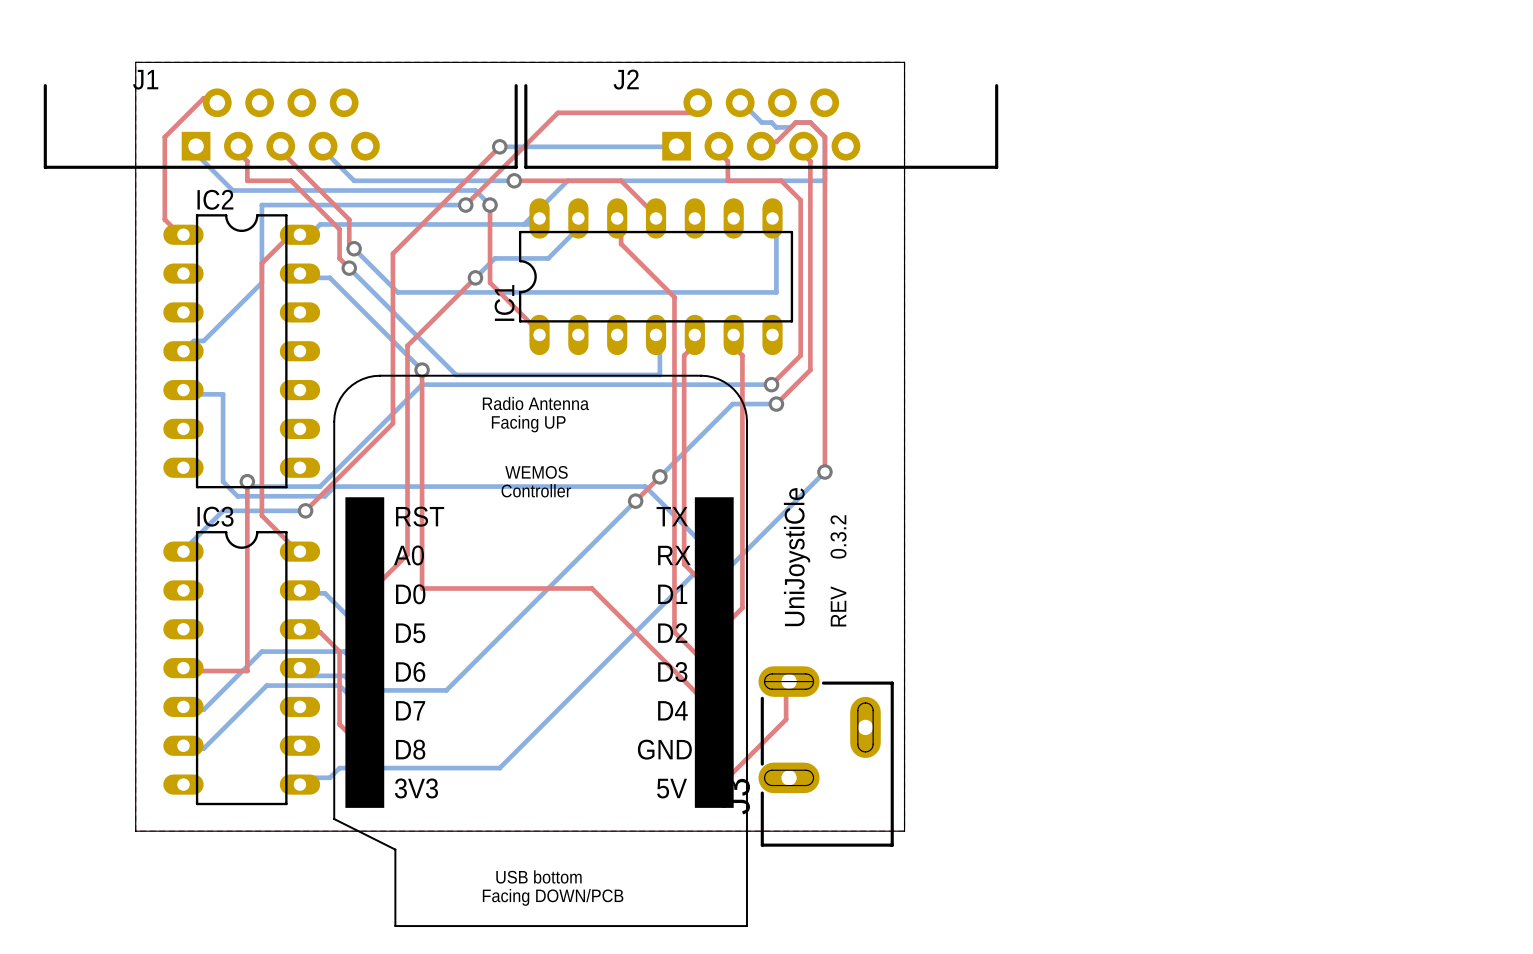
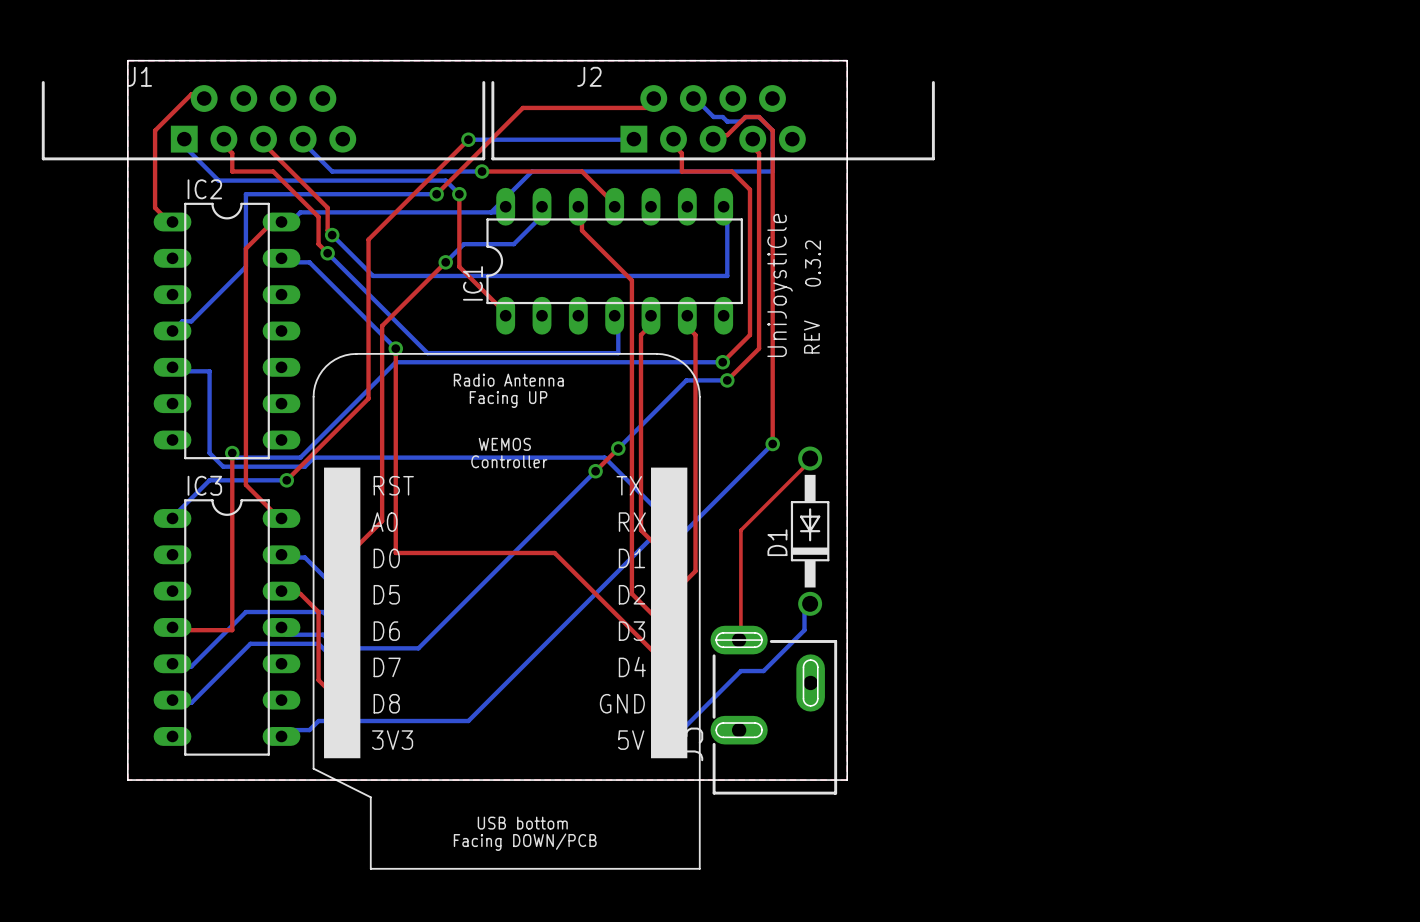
text position: 0.3.2 (838, 536) -> 0.3.2 (813, 263)
text position: UniJoystiCle (797, 557) -> UniJoystiCle (780, 285)
D1: none -> (810, 531)
text position: REV (838, 606) -> REV (811, 337)
bottom track: none -> (810, 603) (809, 607) (804, 607) (804, 630) (763, 671) (740, 671) (672, 739) (669, 740)
top track: (789, 681) (786, 685) (786, 719) (718, 787) (714, 788) -> (739, 640) (740, 639) (740, 530) (809, 462) (810, 458)

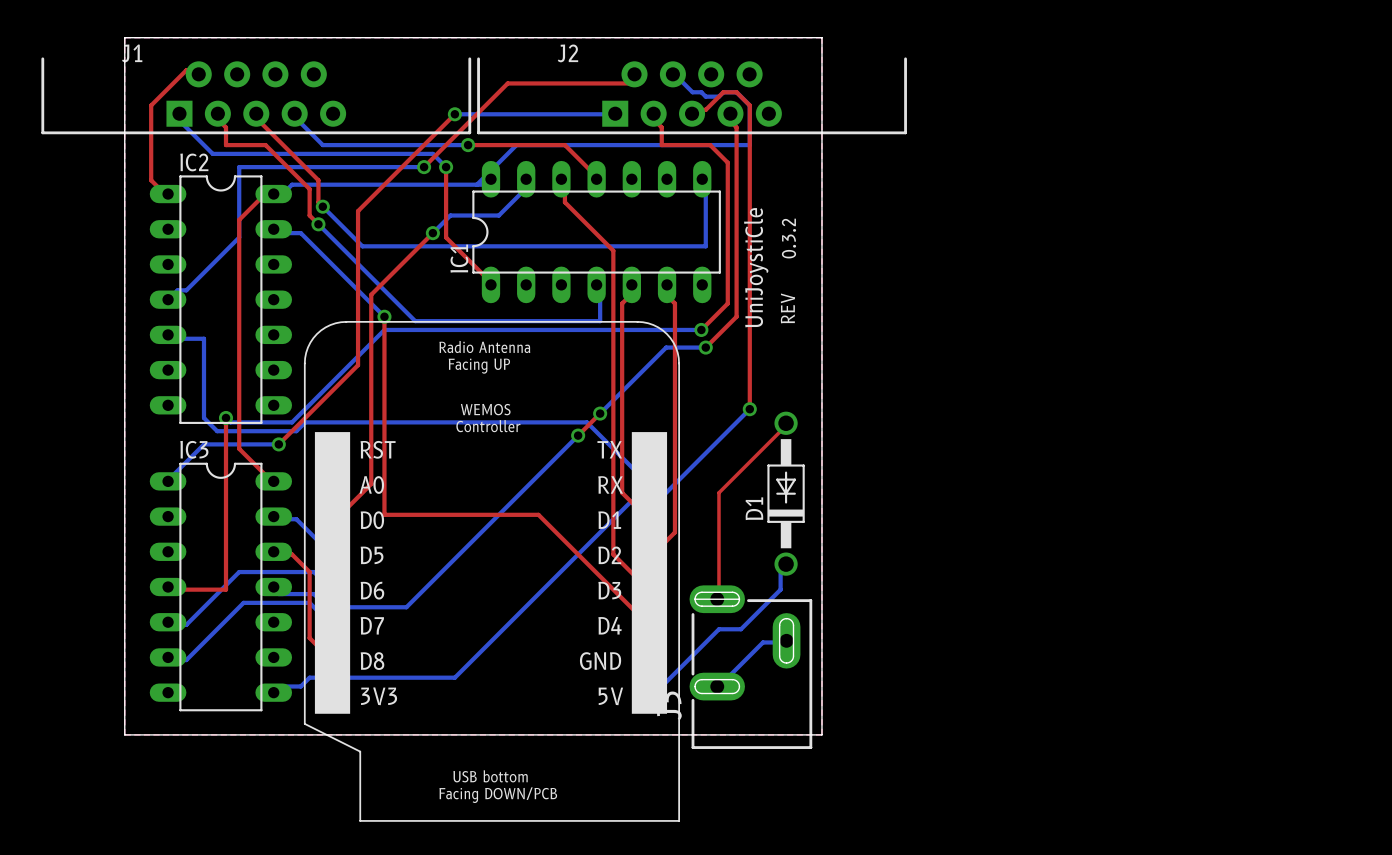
bottom track: none -> (786, 640) (785, 642) (763, 642) (717, 686)

